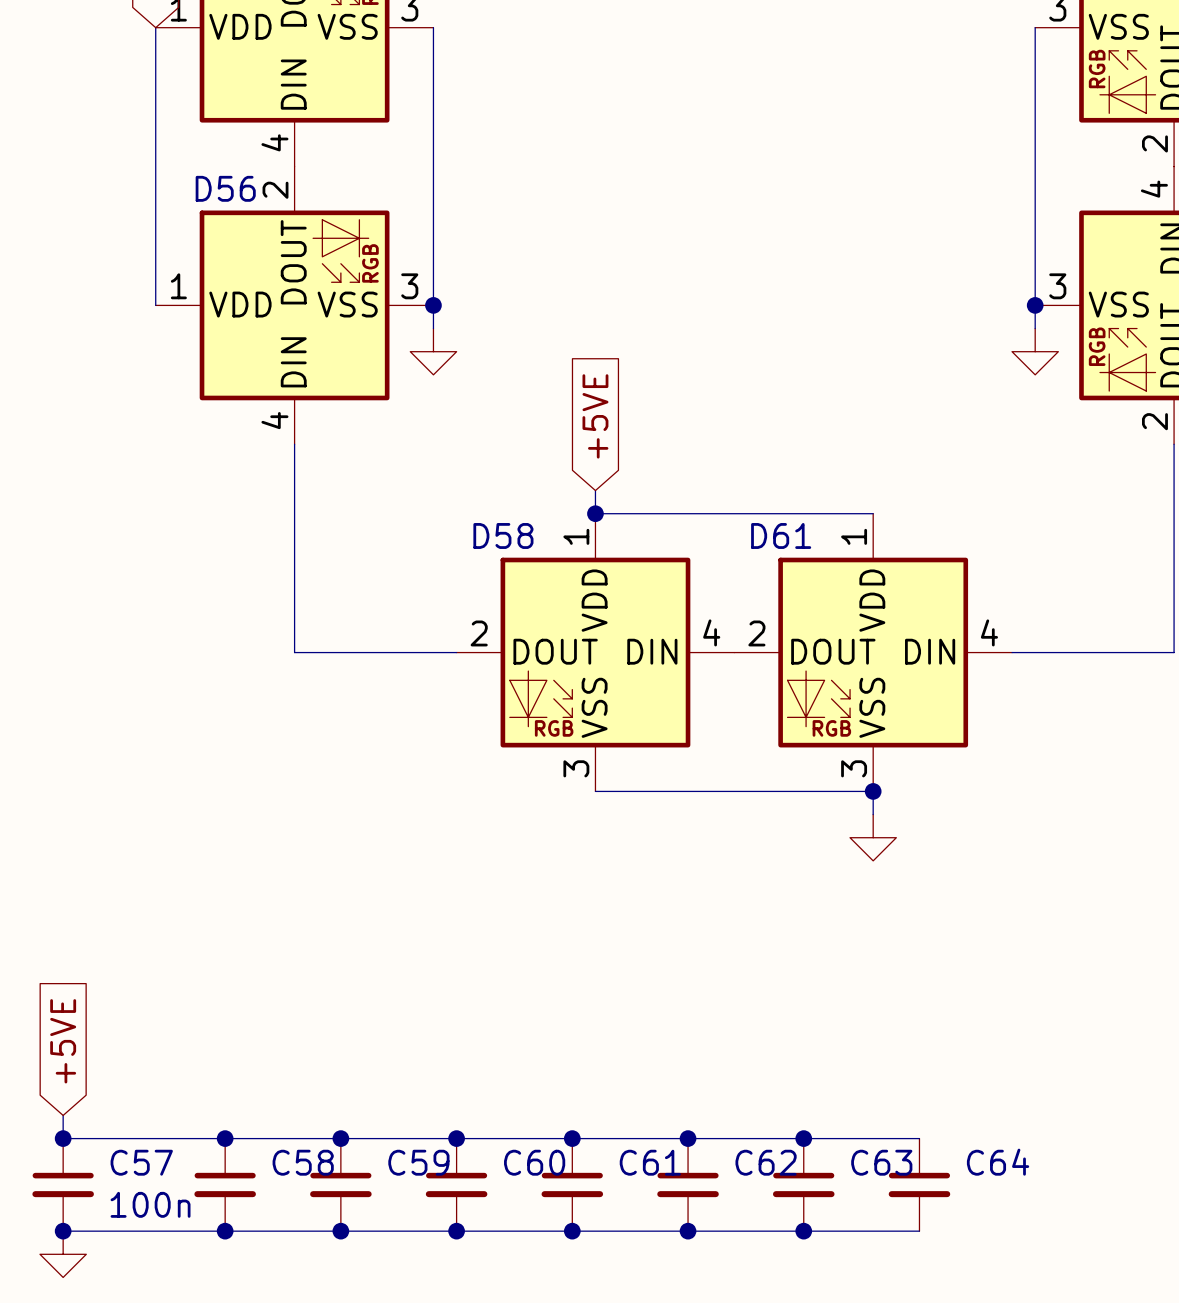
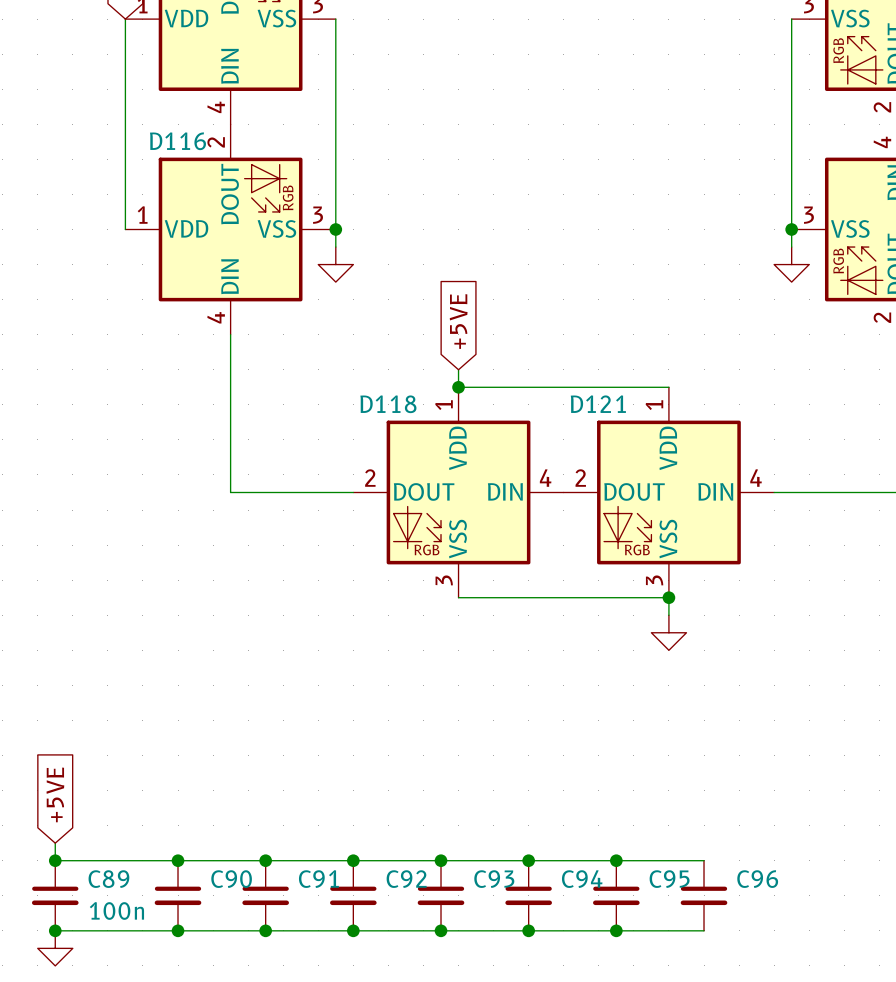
D56 name: D56 (225, 188) -> D116 (177, 141)
D58 name: D58 (503, 535) -> D118 (388, 404)
D61 name: D61 (781, 535) -> D121 (598, 404)
C57 name: C57 (141, 1162) -> C89 (108, 879)
C58 name: C58 (303, 1162) -> C90 (231, 879)
C59 name: C59 (418, 1162) -> C91 (318, 879)
C60 name: C60 (534, 1162) -> C92 (406, 879)
C61 name: C61 (650, 1162) -> C93 (494, 879)
C62 name: C62 (766, 1162) -> C94 (582, 879)
C63 name: C63 (881, 1162) -> C95 (669, 879)
C64 name: C64 (998, 1162) -> C96 (757, 879)

